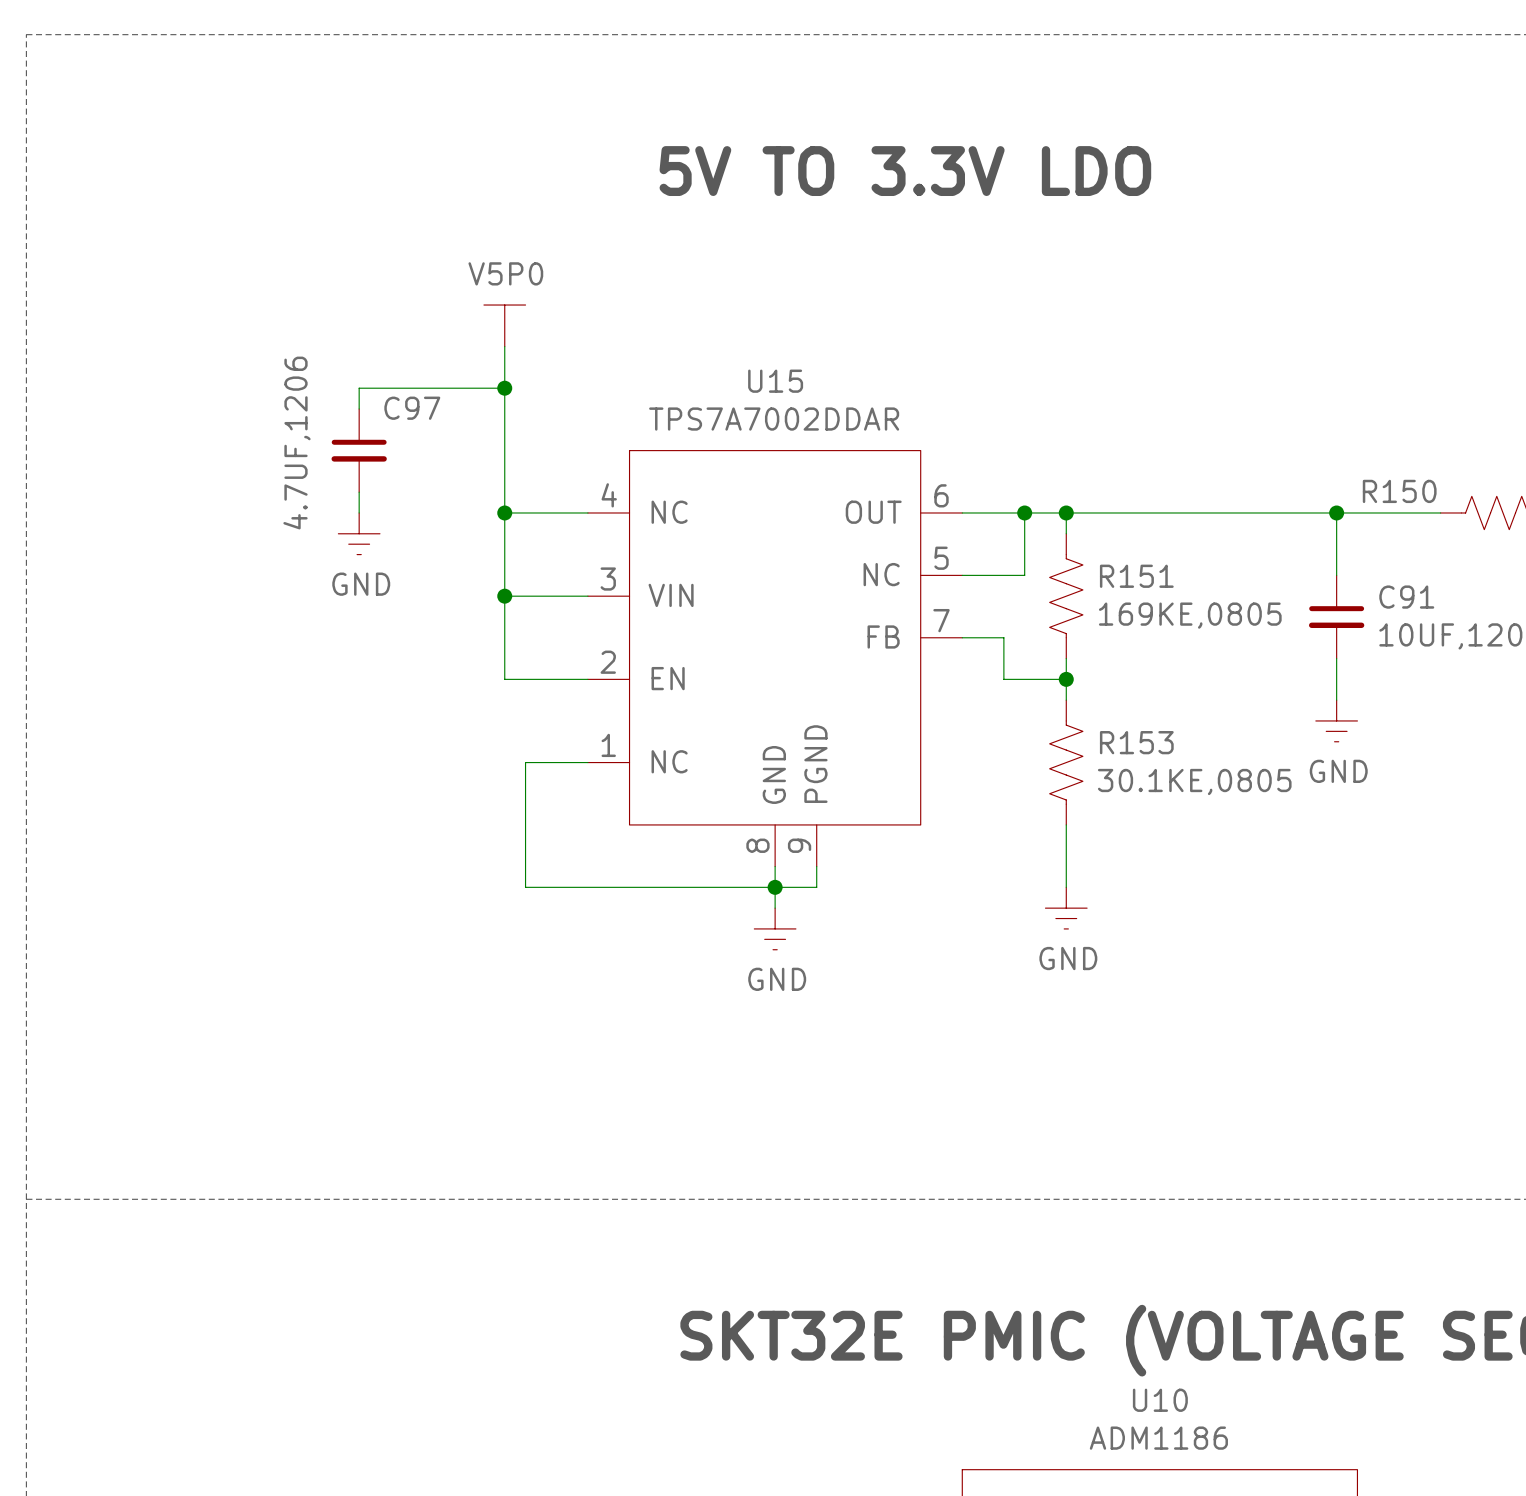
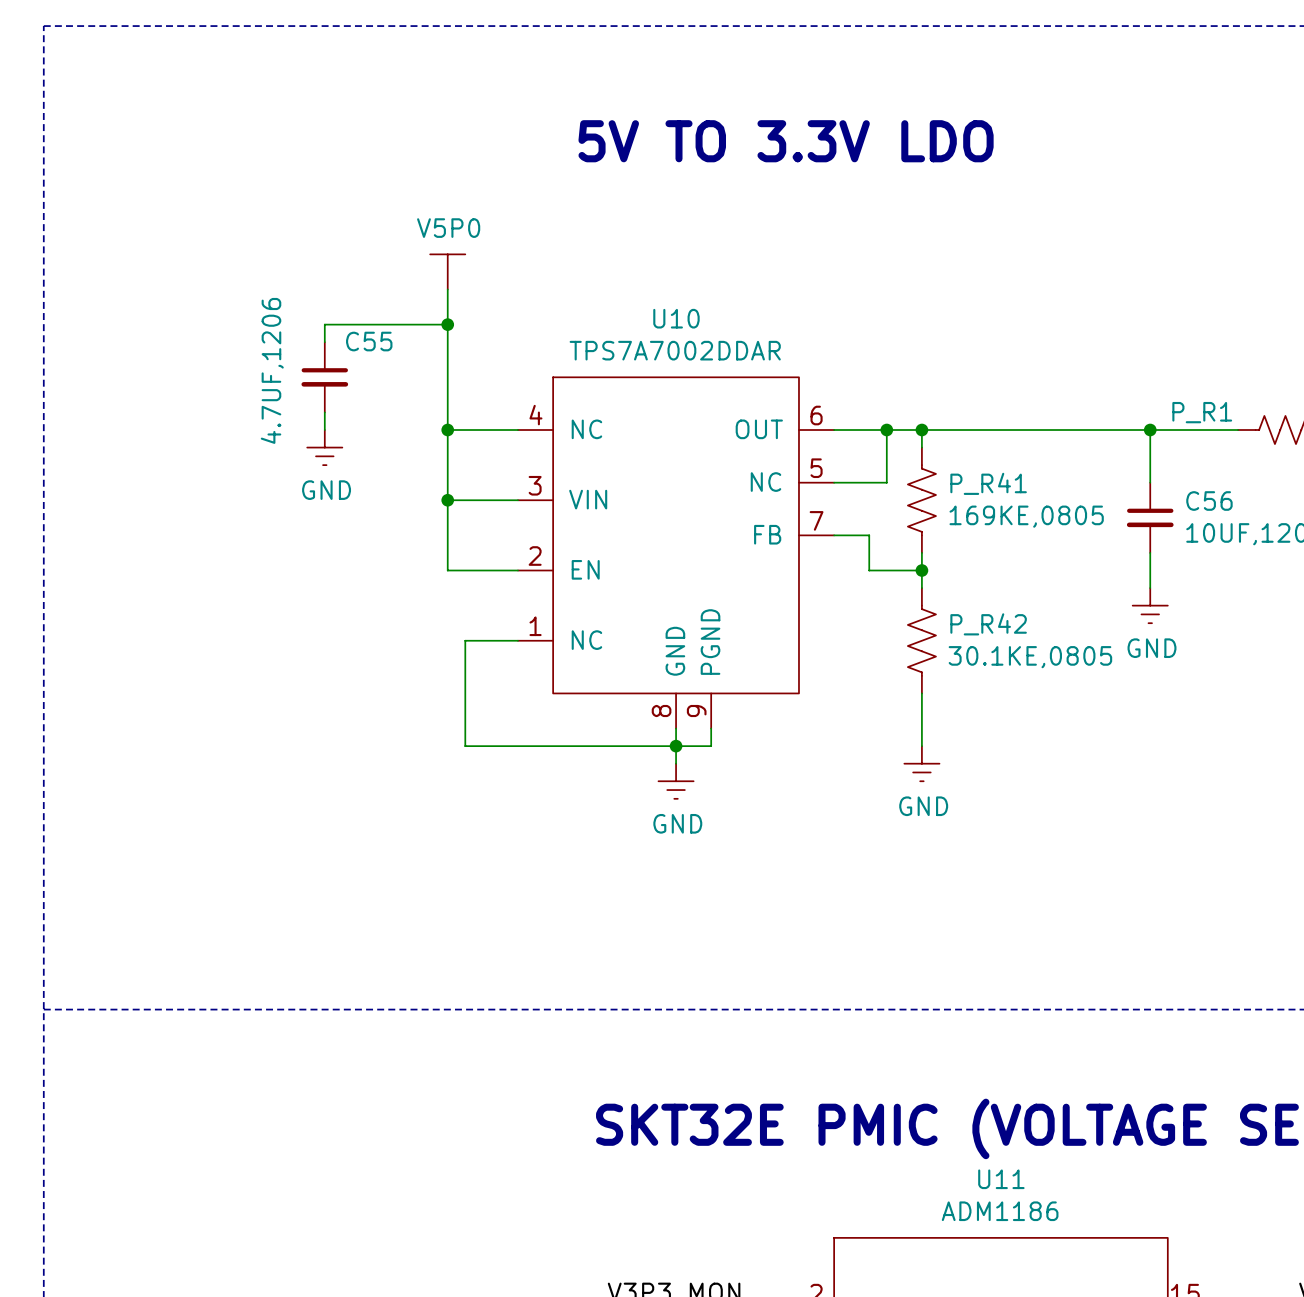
U15 name: U15 (775, 381) -> U10 (676, 318)
C97 name: C97 (412, 408) -> C55 (369, 341)
R150 name: R150 (1399, 491) -> P_R1 (1202, 412)
R151 name: R151 (1136, 576) -> P_R41 (988, 483)
C91 name: C91 (1406, 597) -> C56 (1209, 501)
R153 name: R153 (1136, 742) -> P_R42 (988, 624)
U10 name: U10 (1160, 1400) -> U11 (1001, 1179)

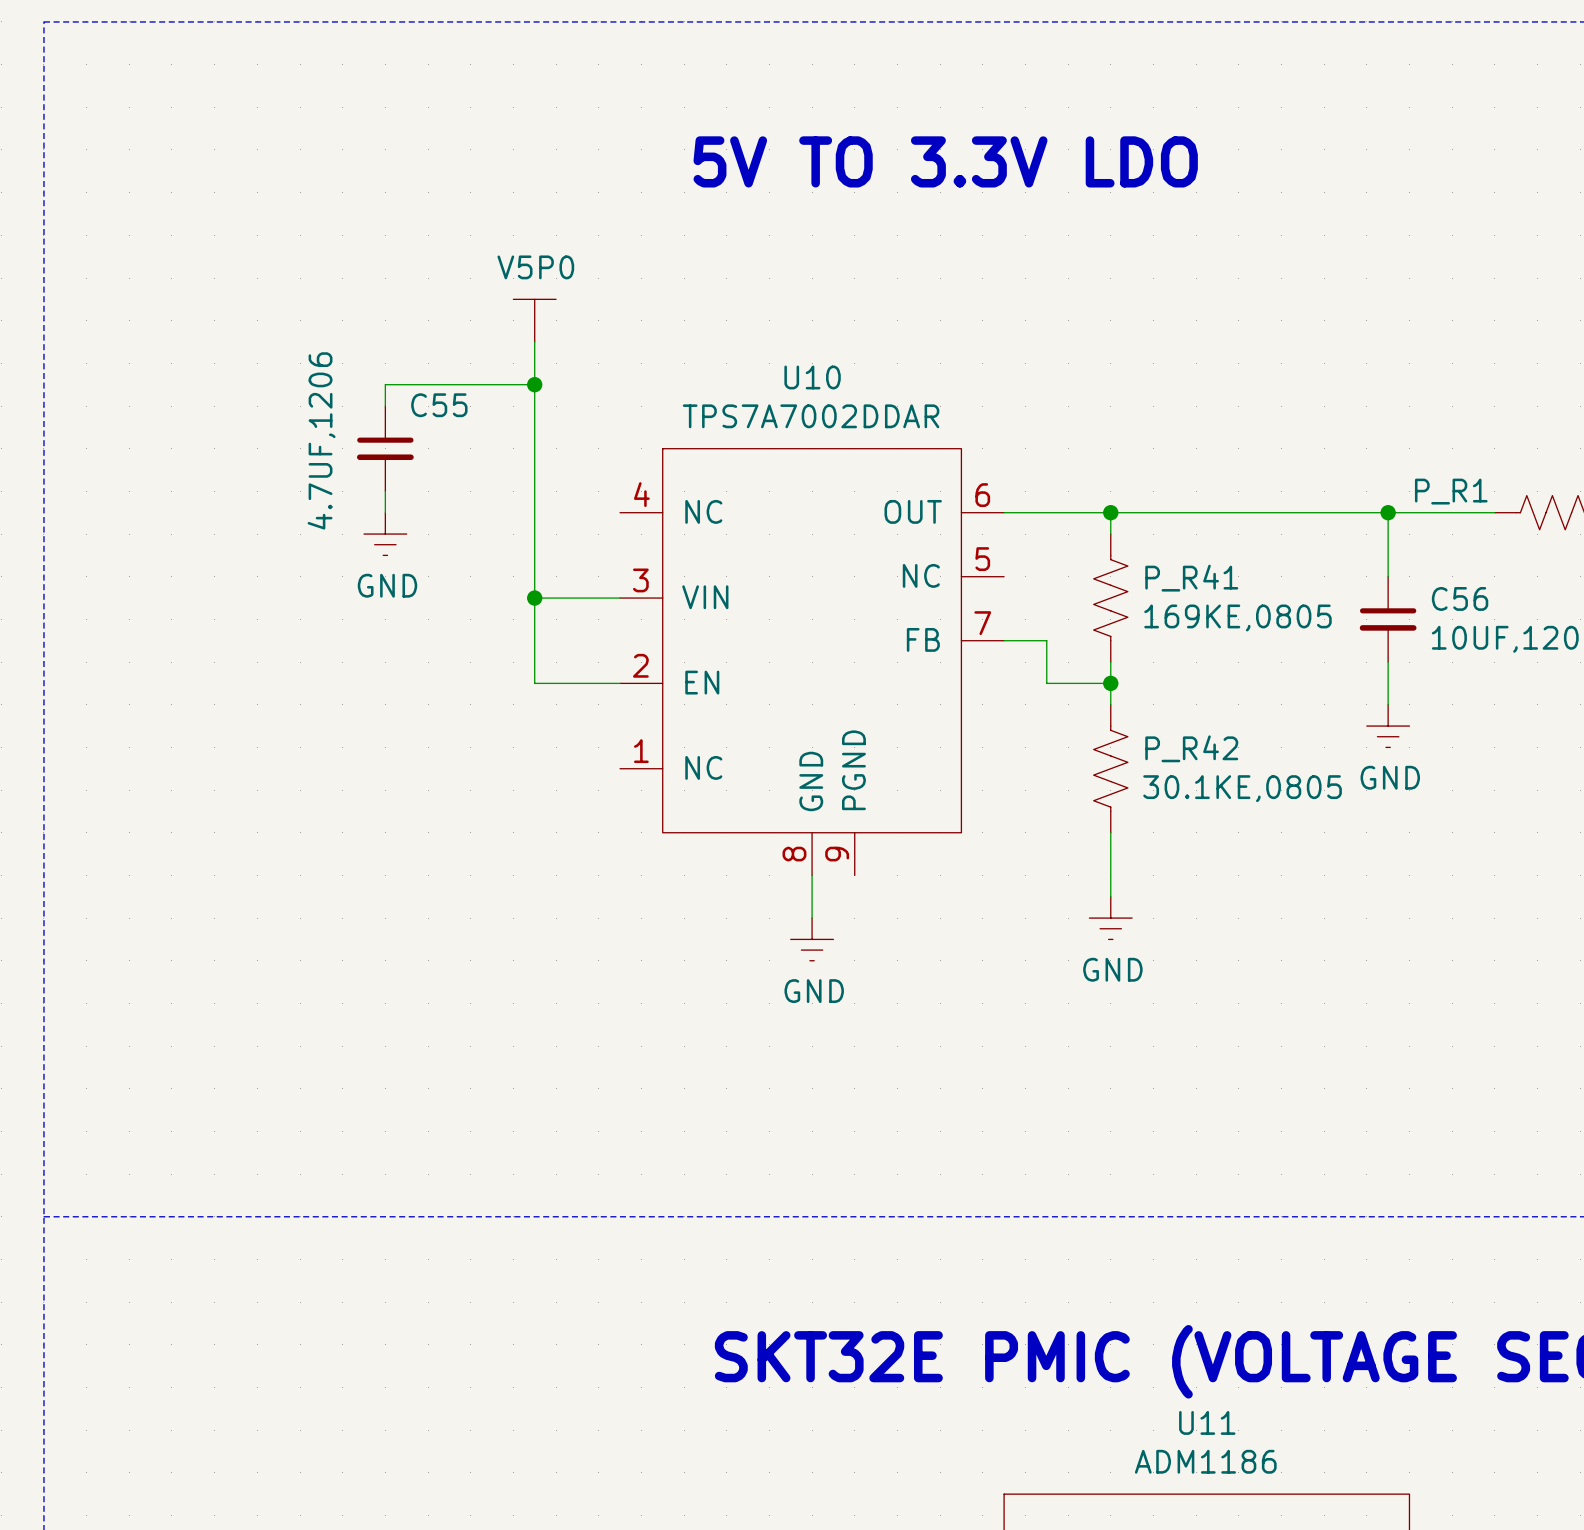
wire: (447, 430) (517, 430) -> none
junction: (447, 430) -> none
wire: (886, 430) (886, 482) (834, 482) -> none
junction: (886, 430) -> none
wire: (517, 640) (465, 640) (465, 746) (711, 746) (711, 728) -> none
junction: (676, 746) -> none

